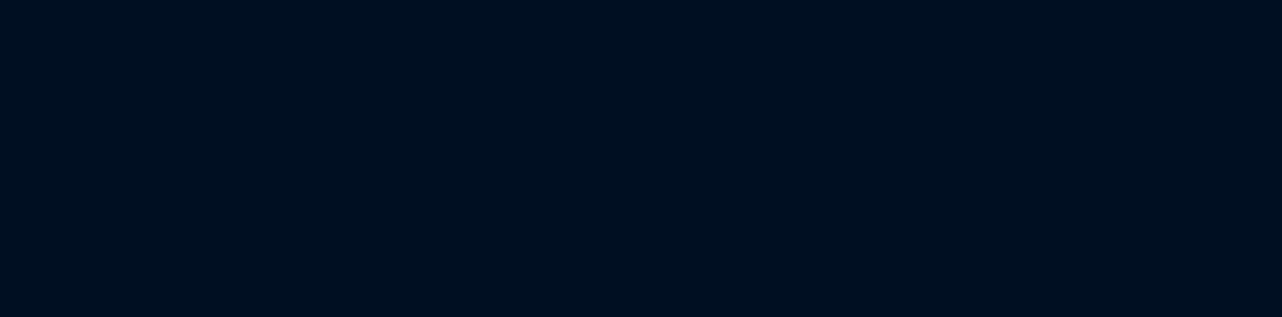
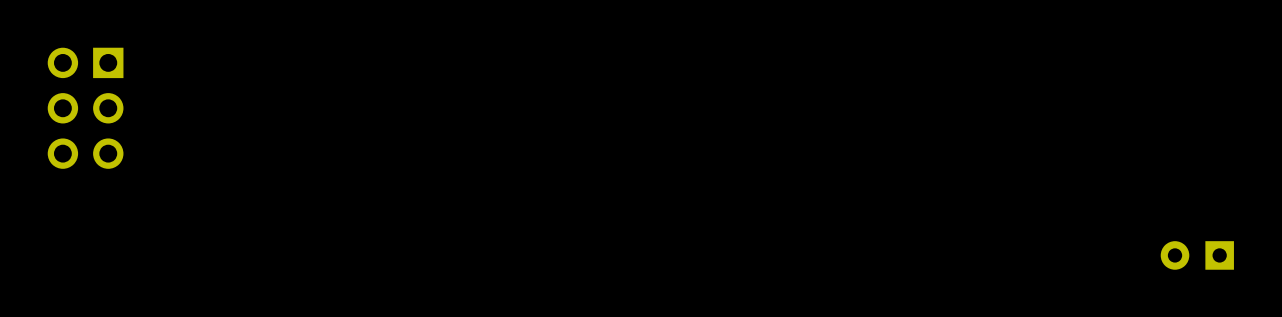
part: none -> (85, 108)
part: none -> (1197, 255)

